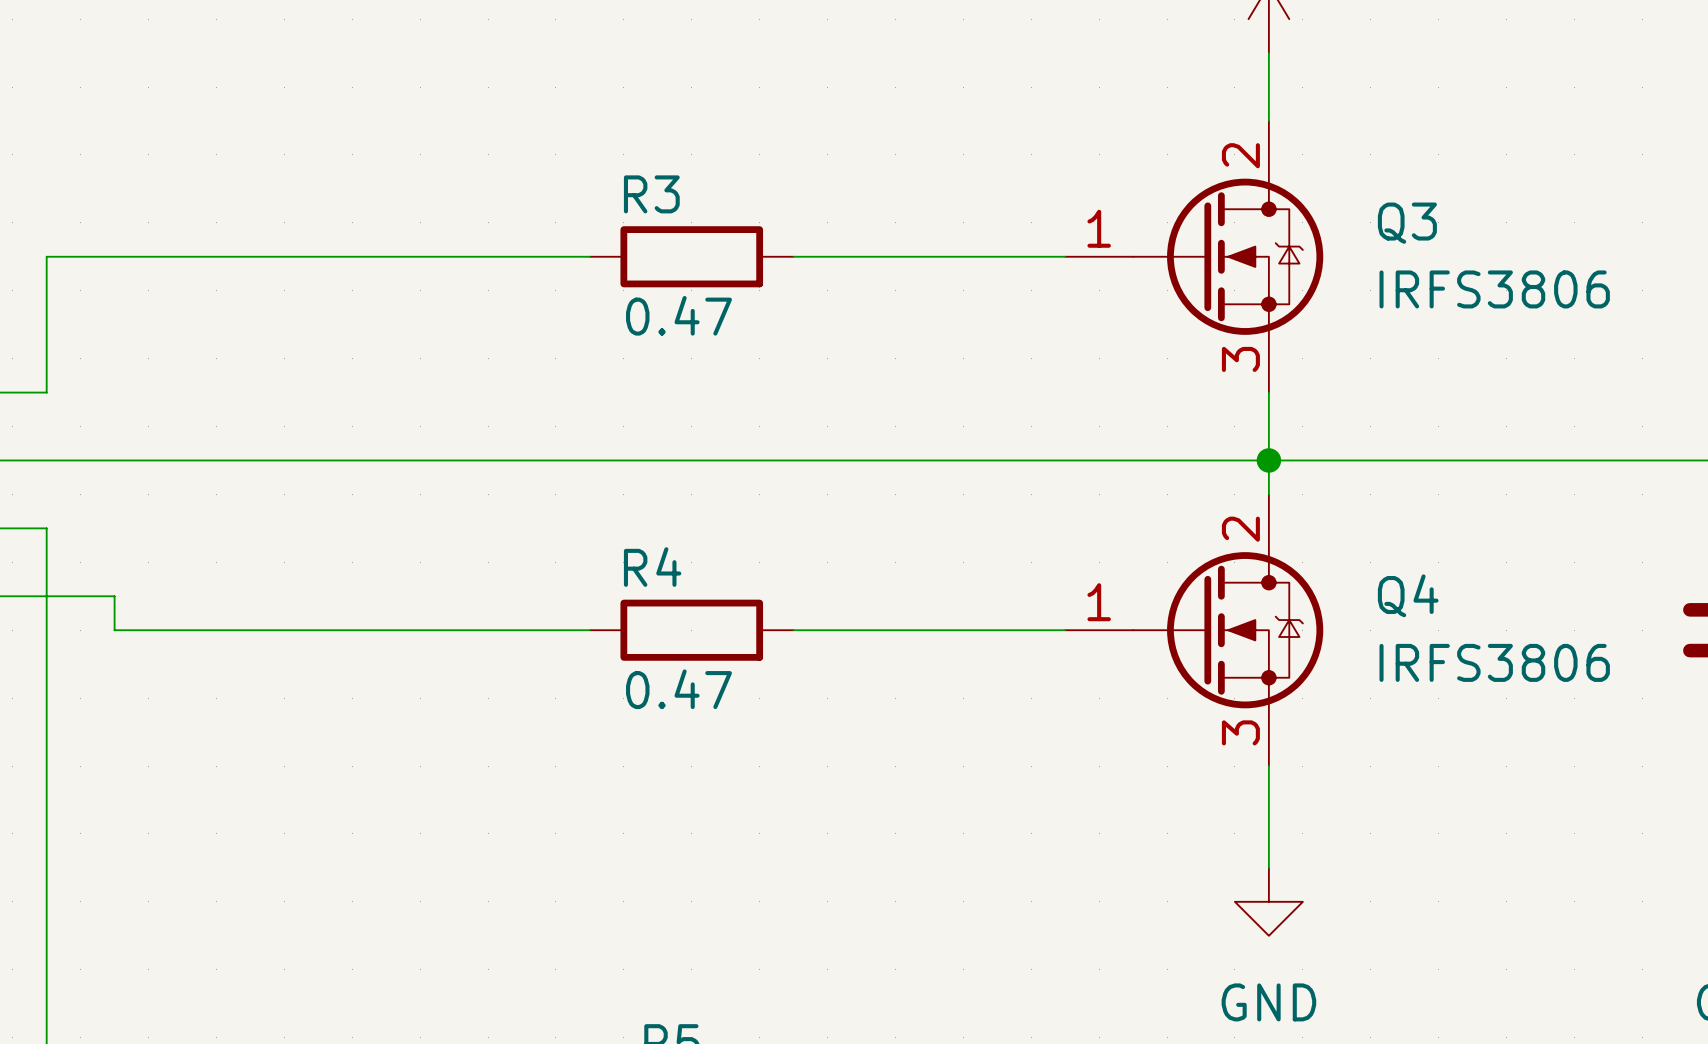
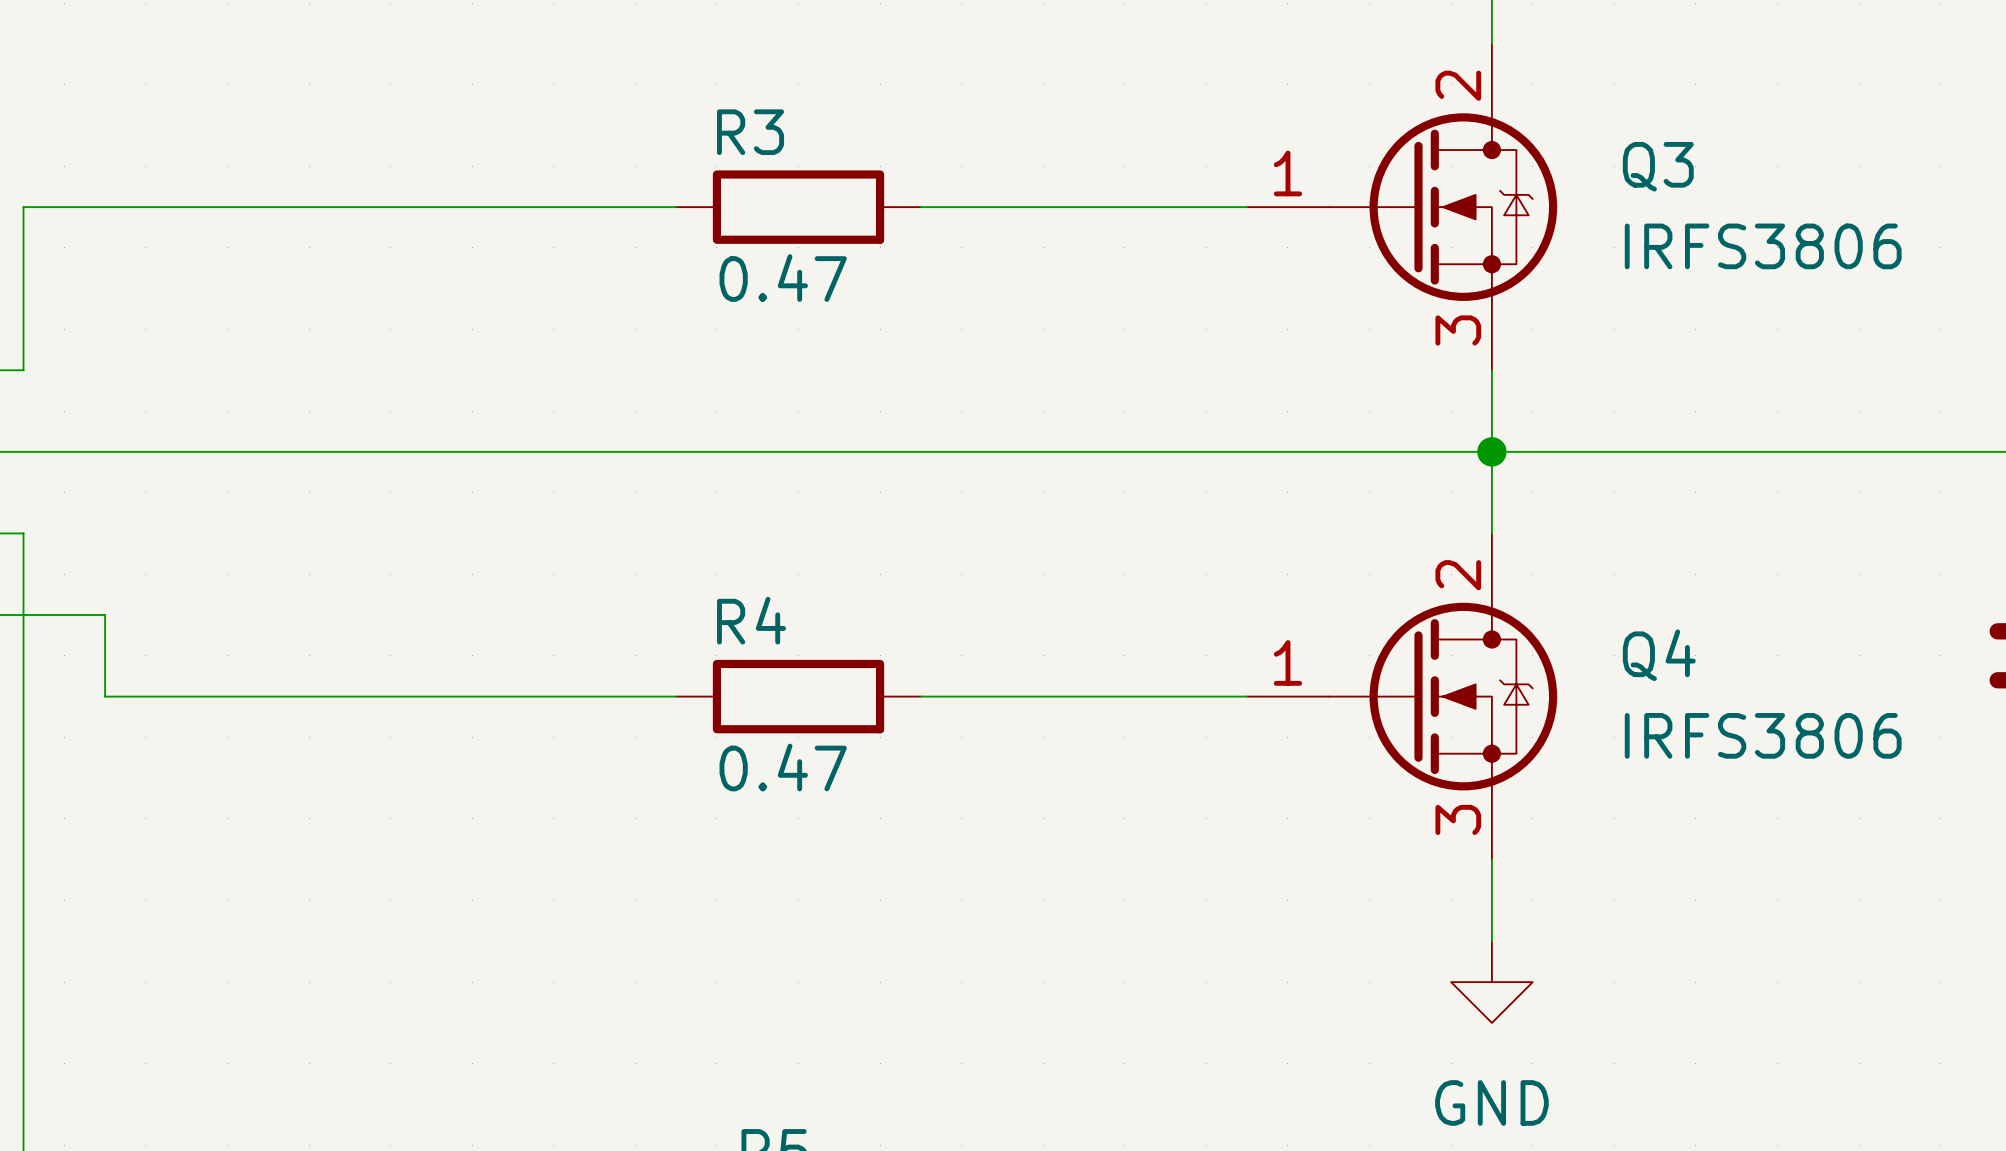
wire: (114, 630) (589, 630) -> (105, 655) (105, 696) (676, 696)
R4 position: (691, 630) -> (798, 696)
wire: (793, 630) (1065, 630) -> (920, 696) (1247, 696)
Q4 position: (1194, 630) -> (1402, 696)

